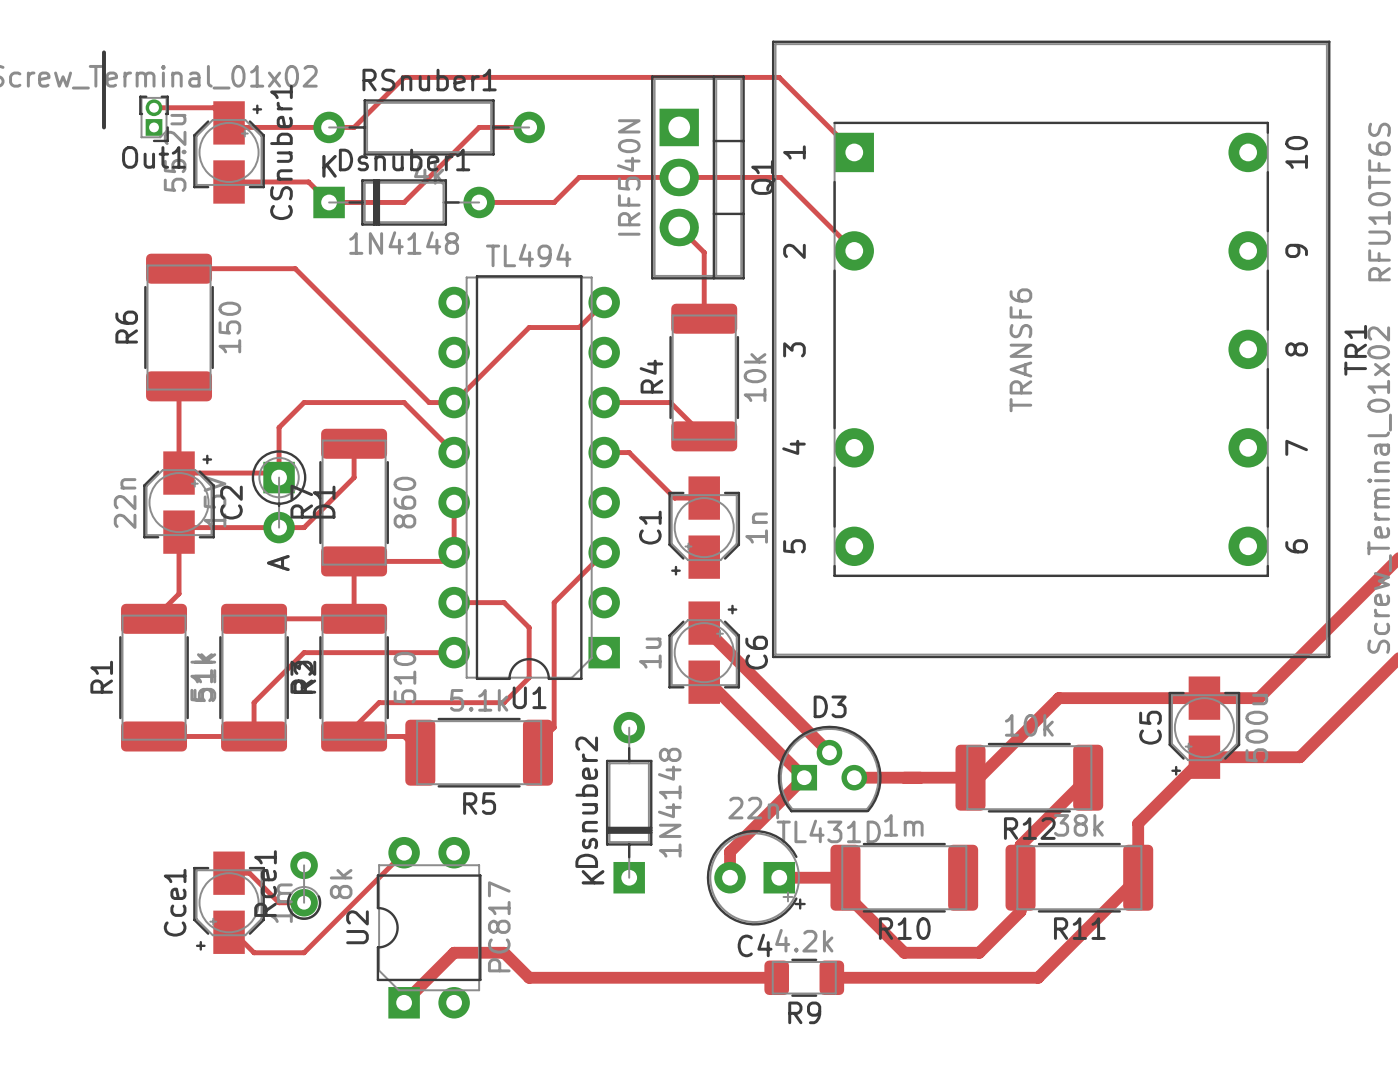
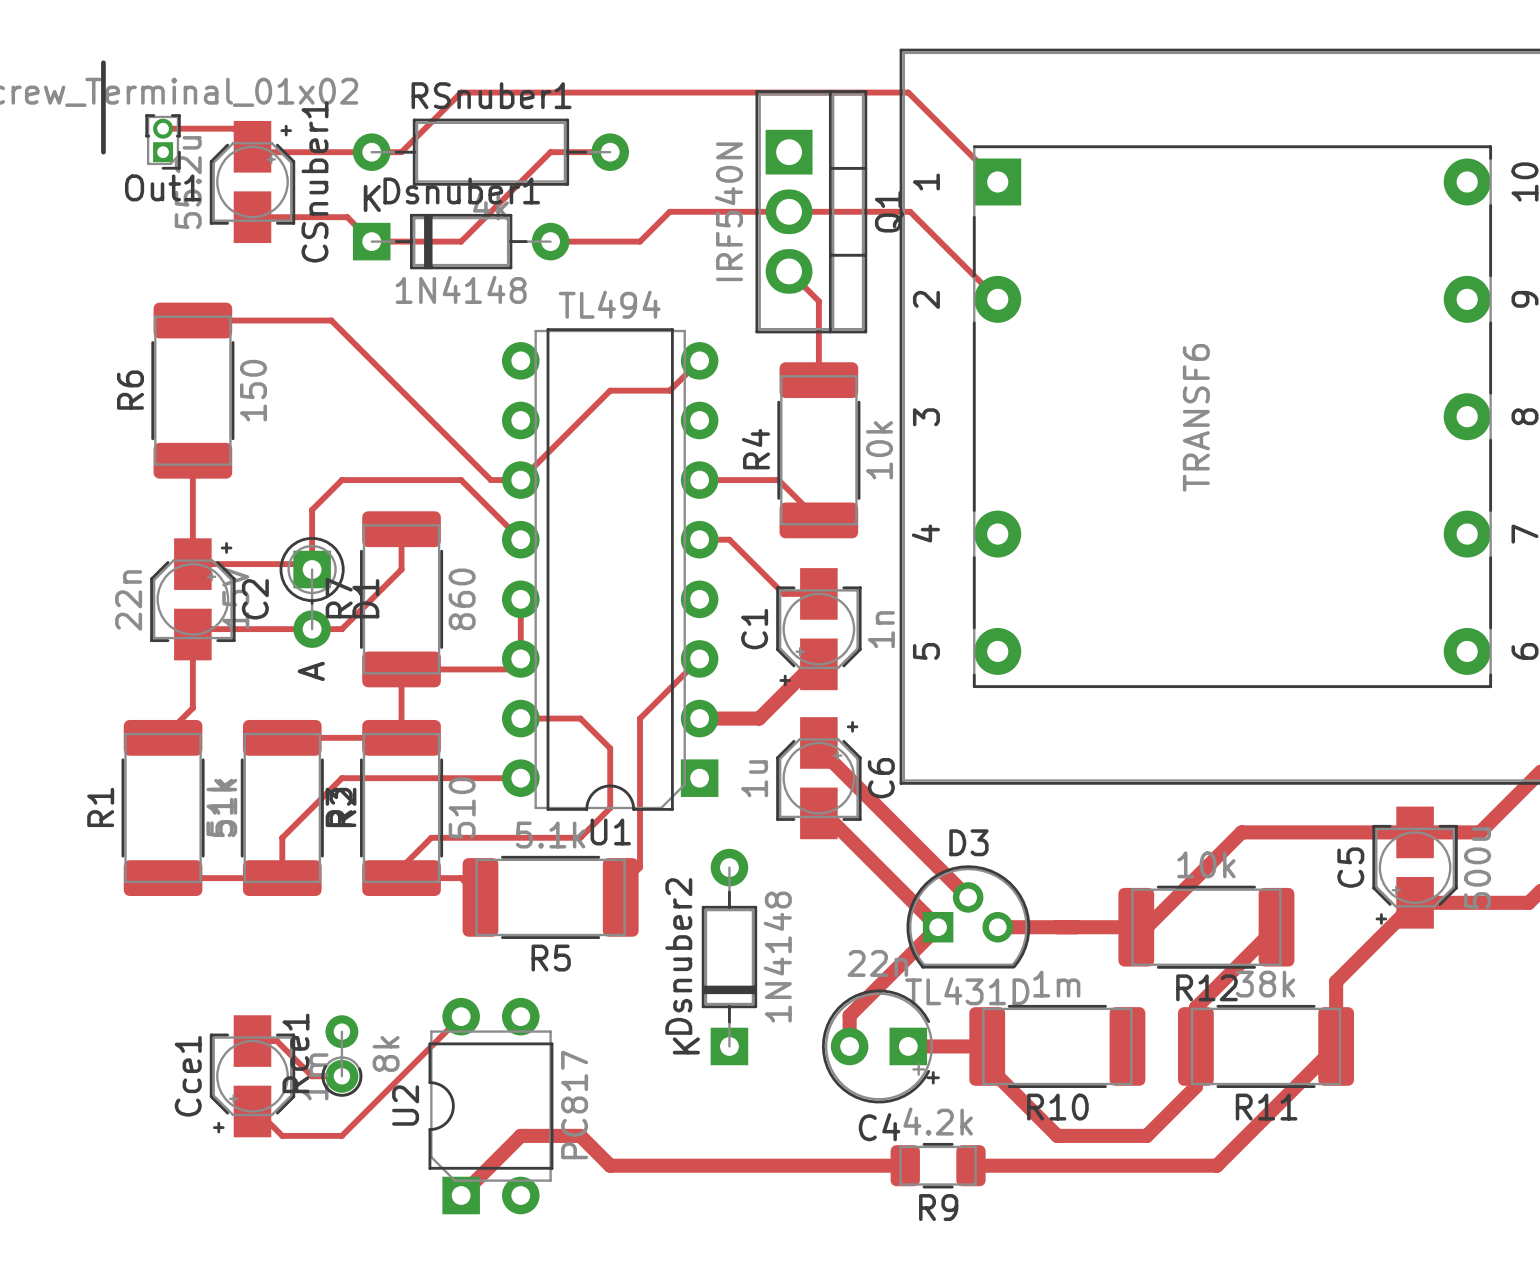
track: none -> (818, 664) (813, 664) (759, 718) (699, 718)

